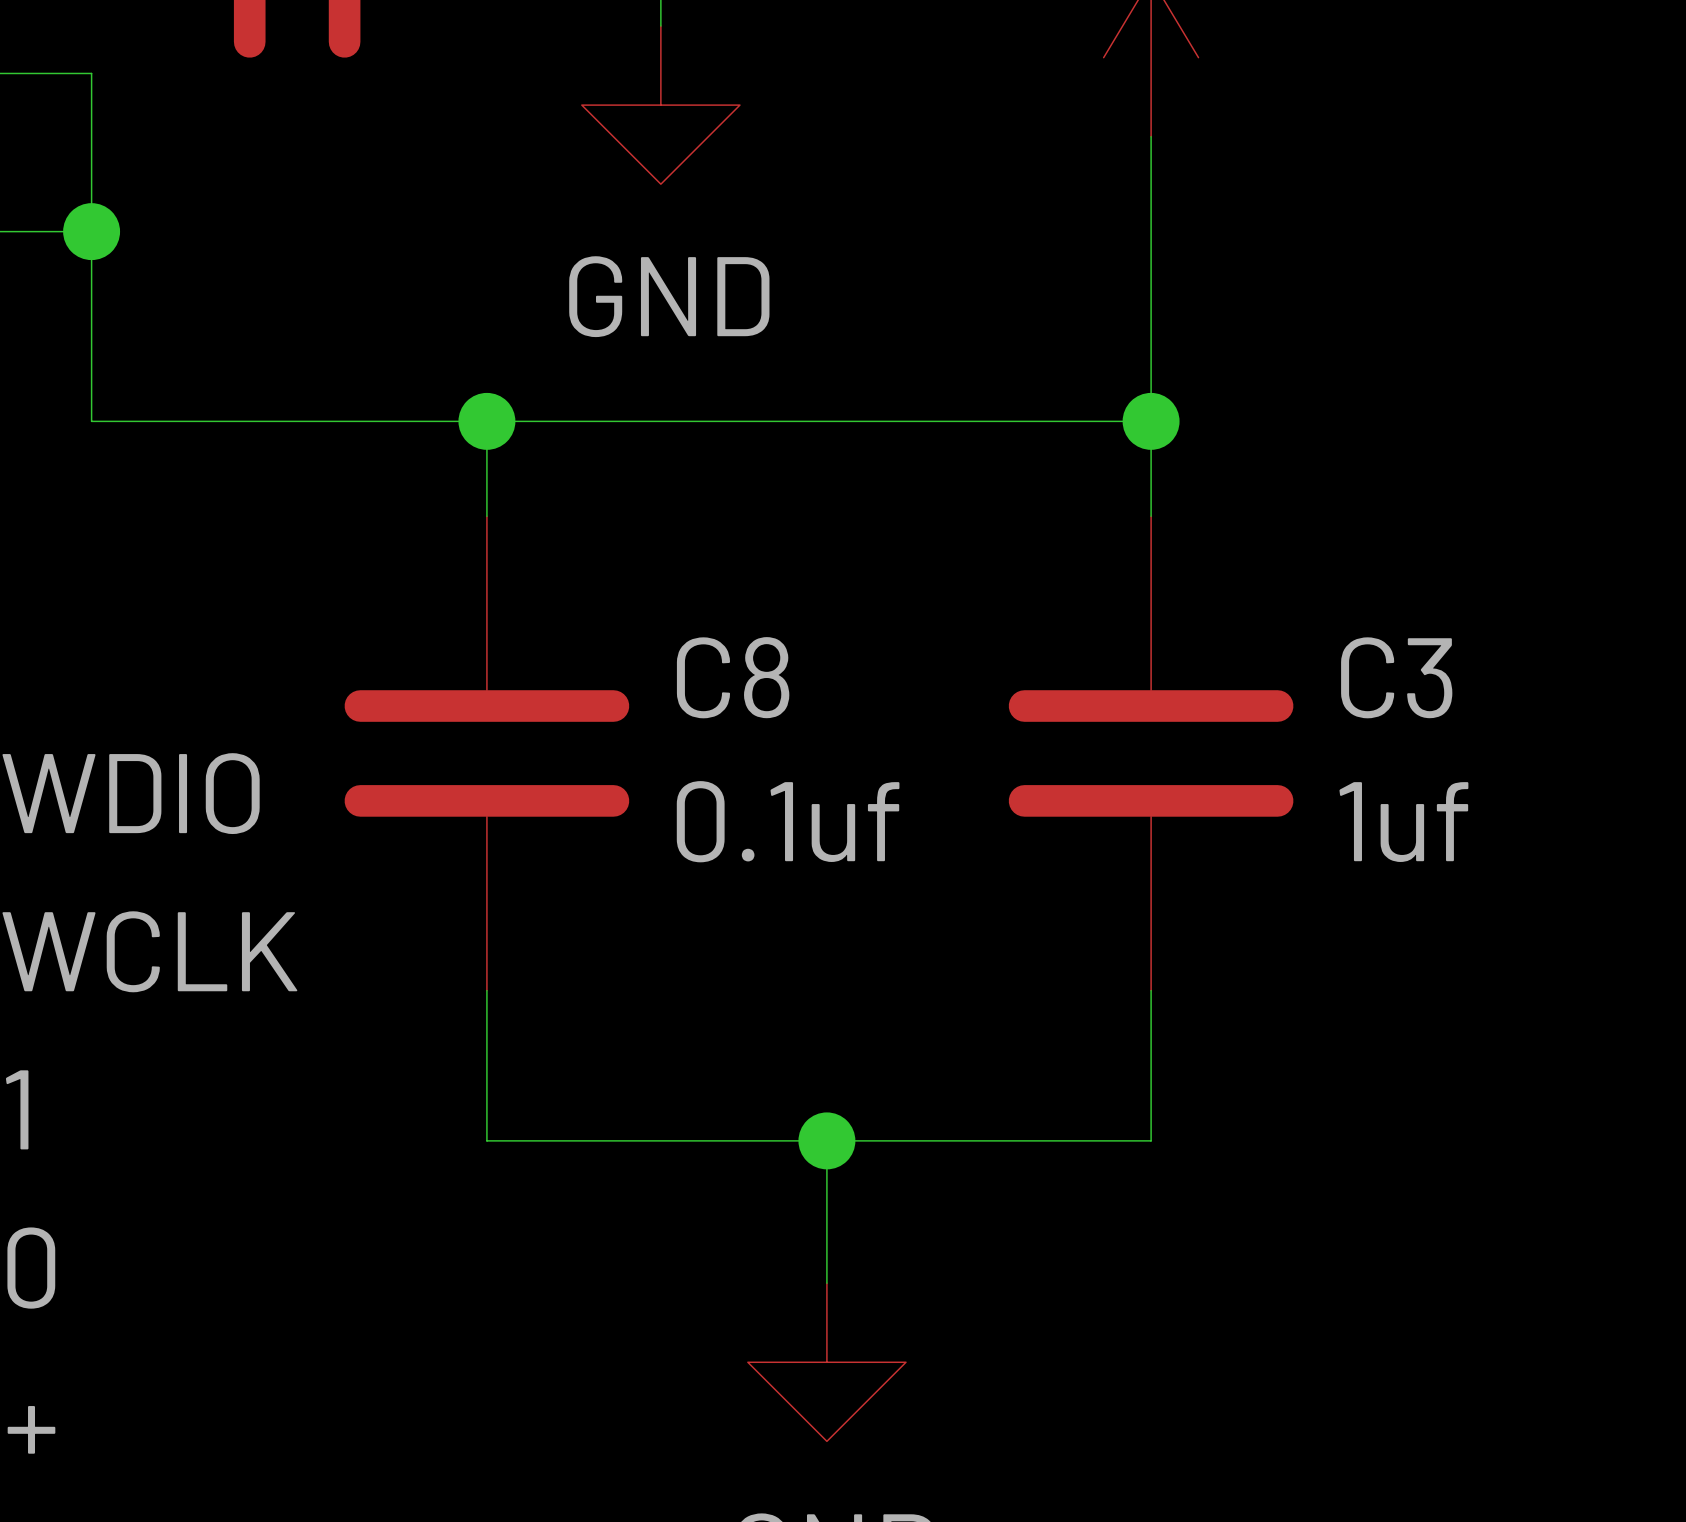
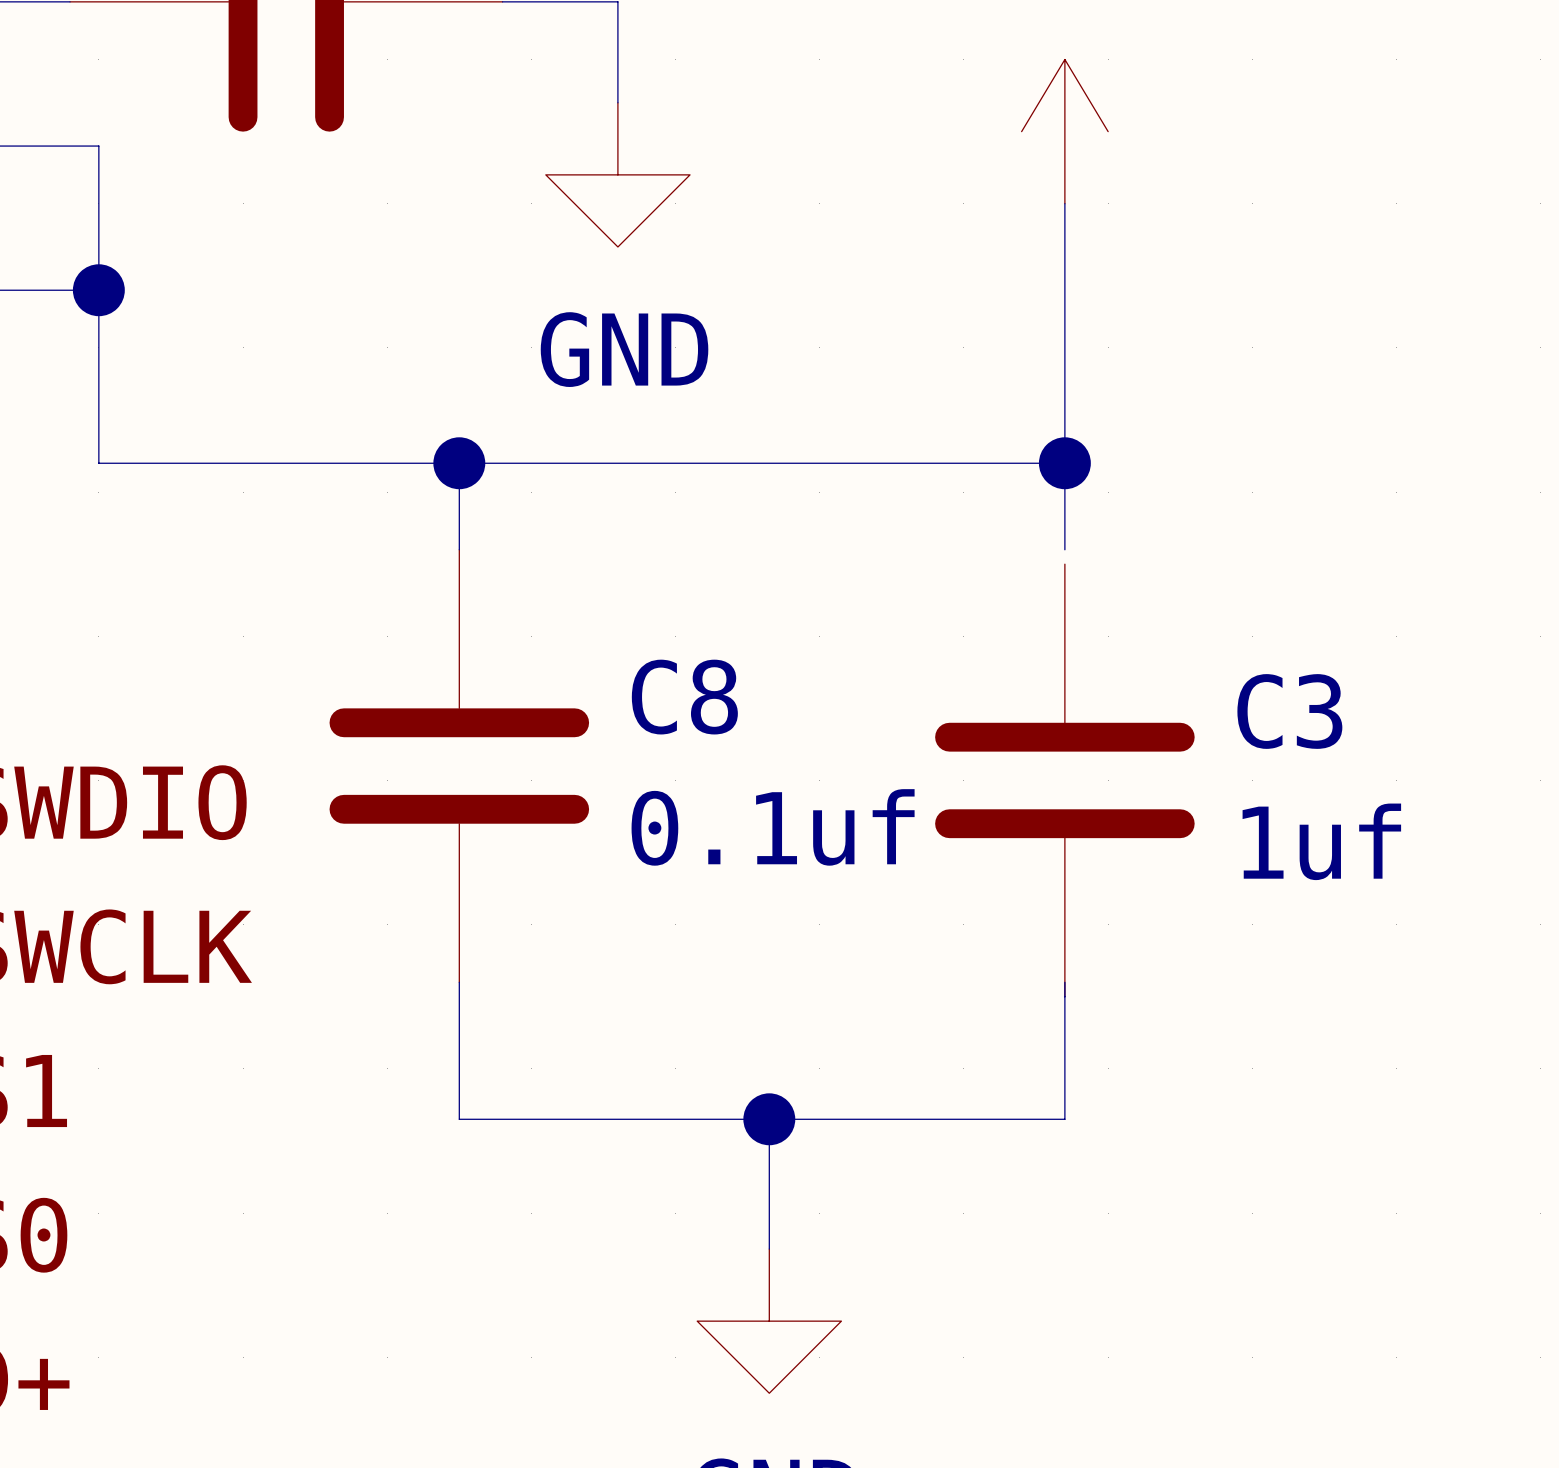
C3 position: (1151, 753) -> (1064, 780)

